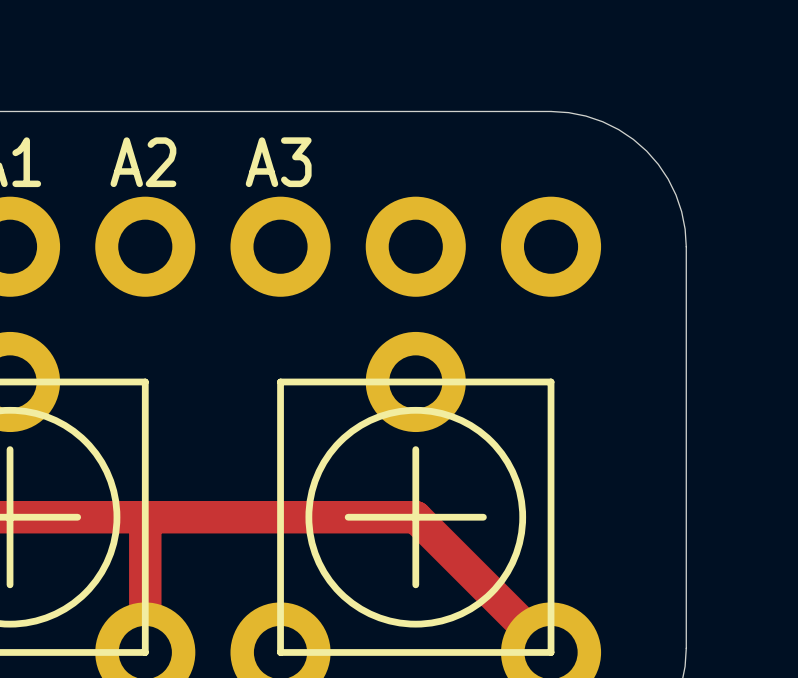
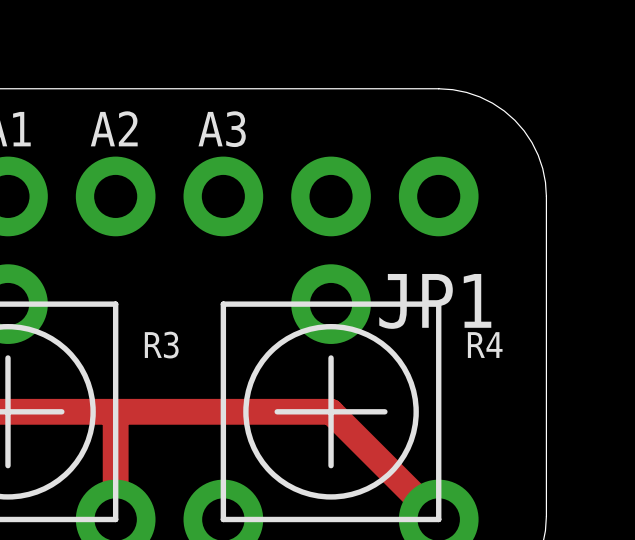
JP1 name: none -> JP1 (435, 301)
R4 name: none -> R4 (485, 345)
R3 name: none -> R3 (161, 345)

